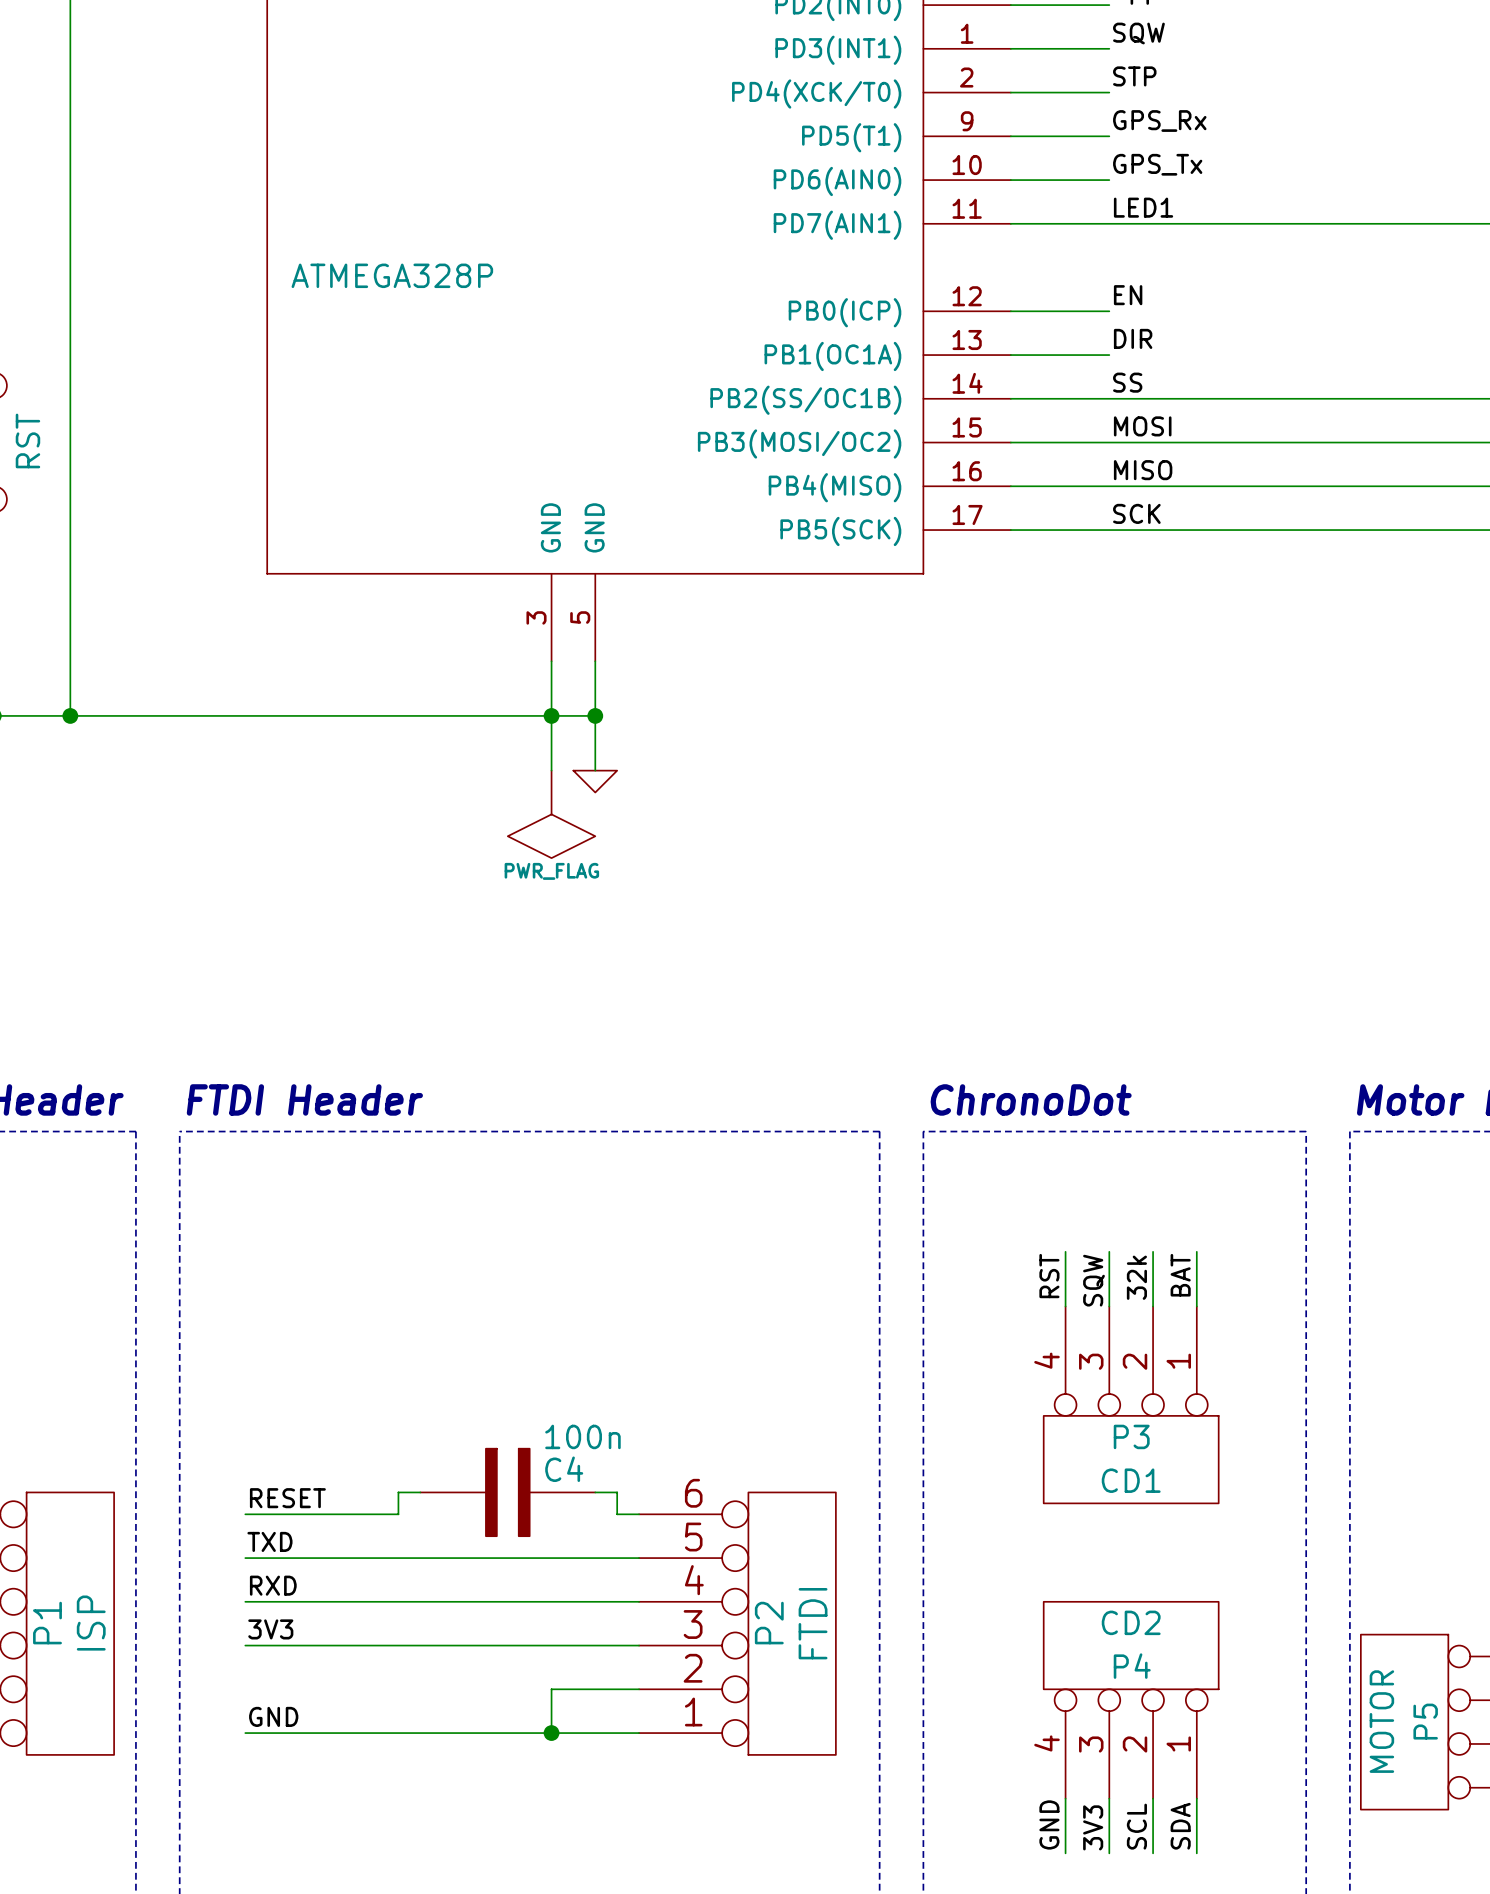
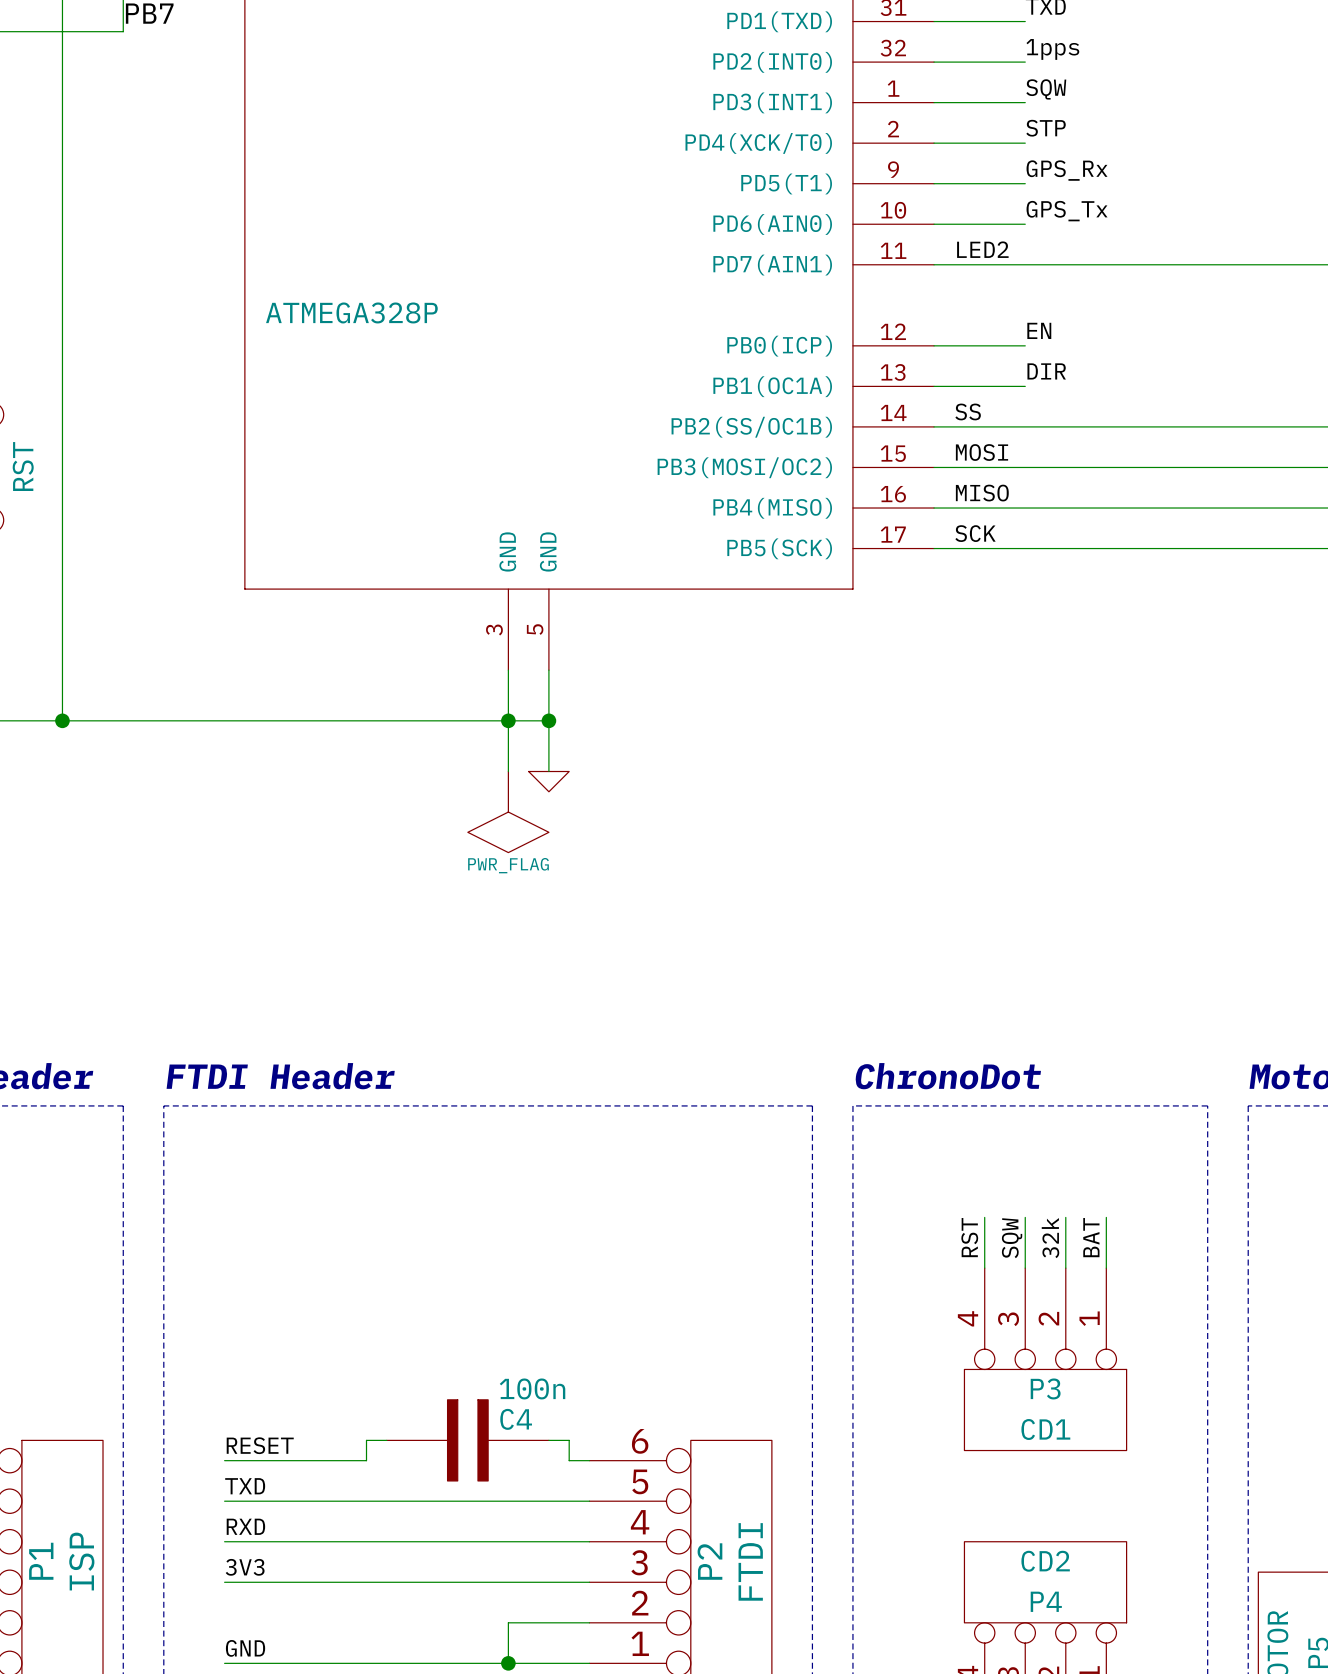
label: LED1 (1143, 207) -> LED2 (982, 249)
label position: SS (1127, 382) -> SS (968, 411)
label position: MOSI (1142, 426) -> MOSI (982, 452)
label position: MISO (1143, 470) -> MISO (982, 493)
label position: SCK (1136, 513) -> SCK (975, 533)

